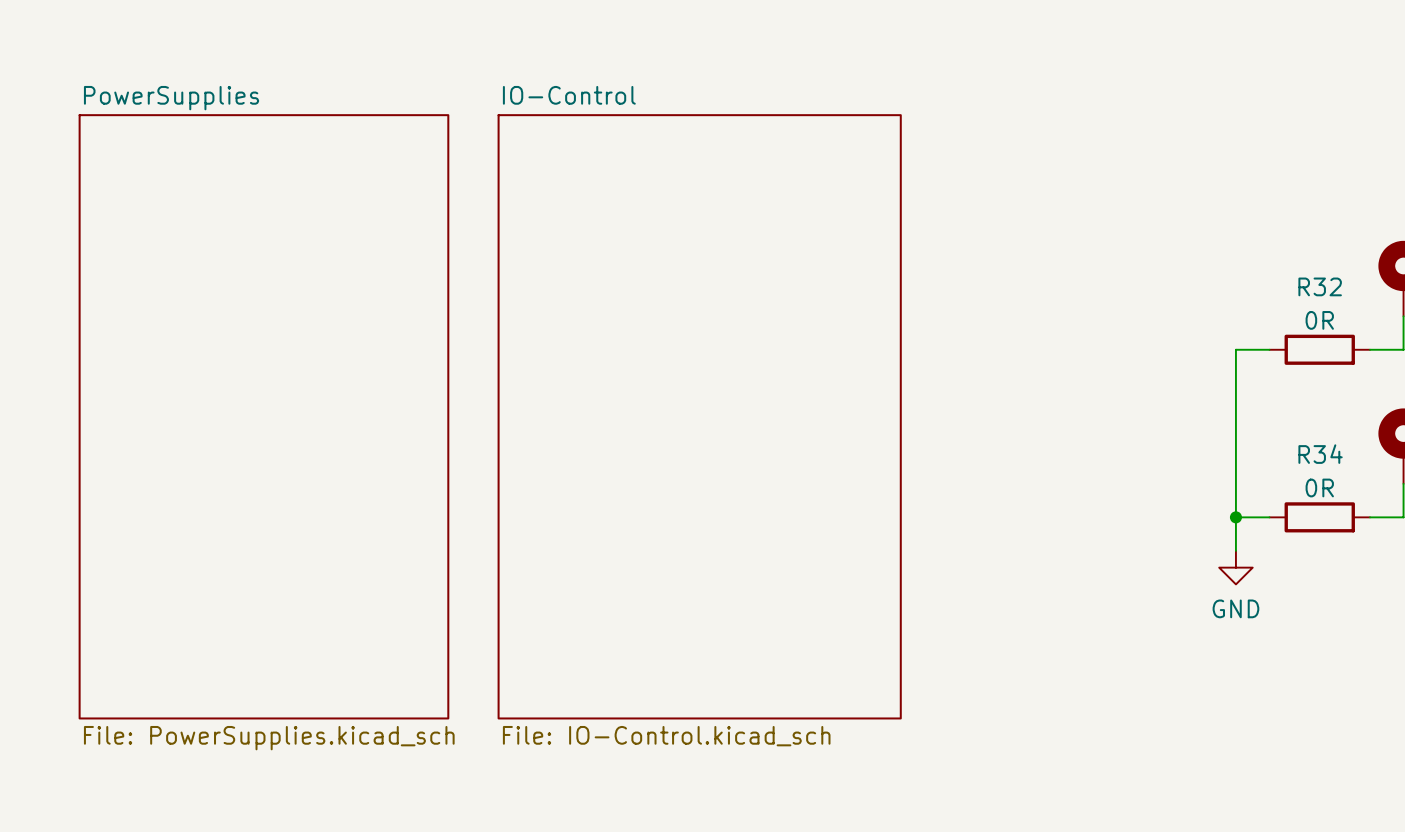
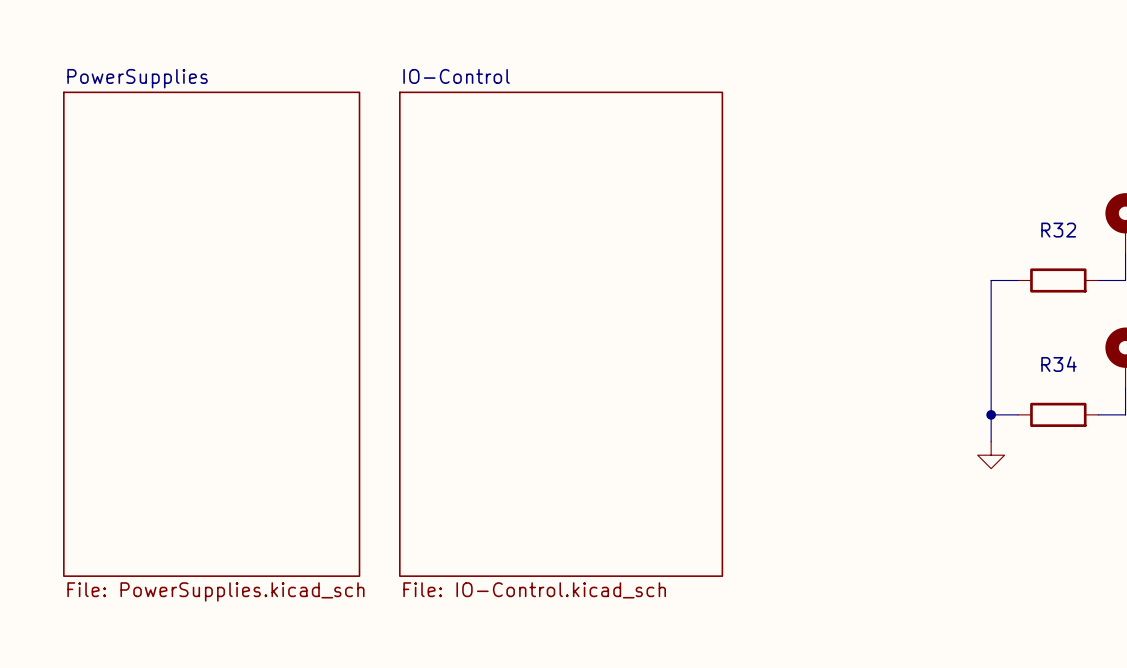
R32 value: 0R (1319, 320) -> none
R34 value: 0R (1319, 487) -> none
power symbol text: GND (1235, 608) -> none

